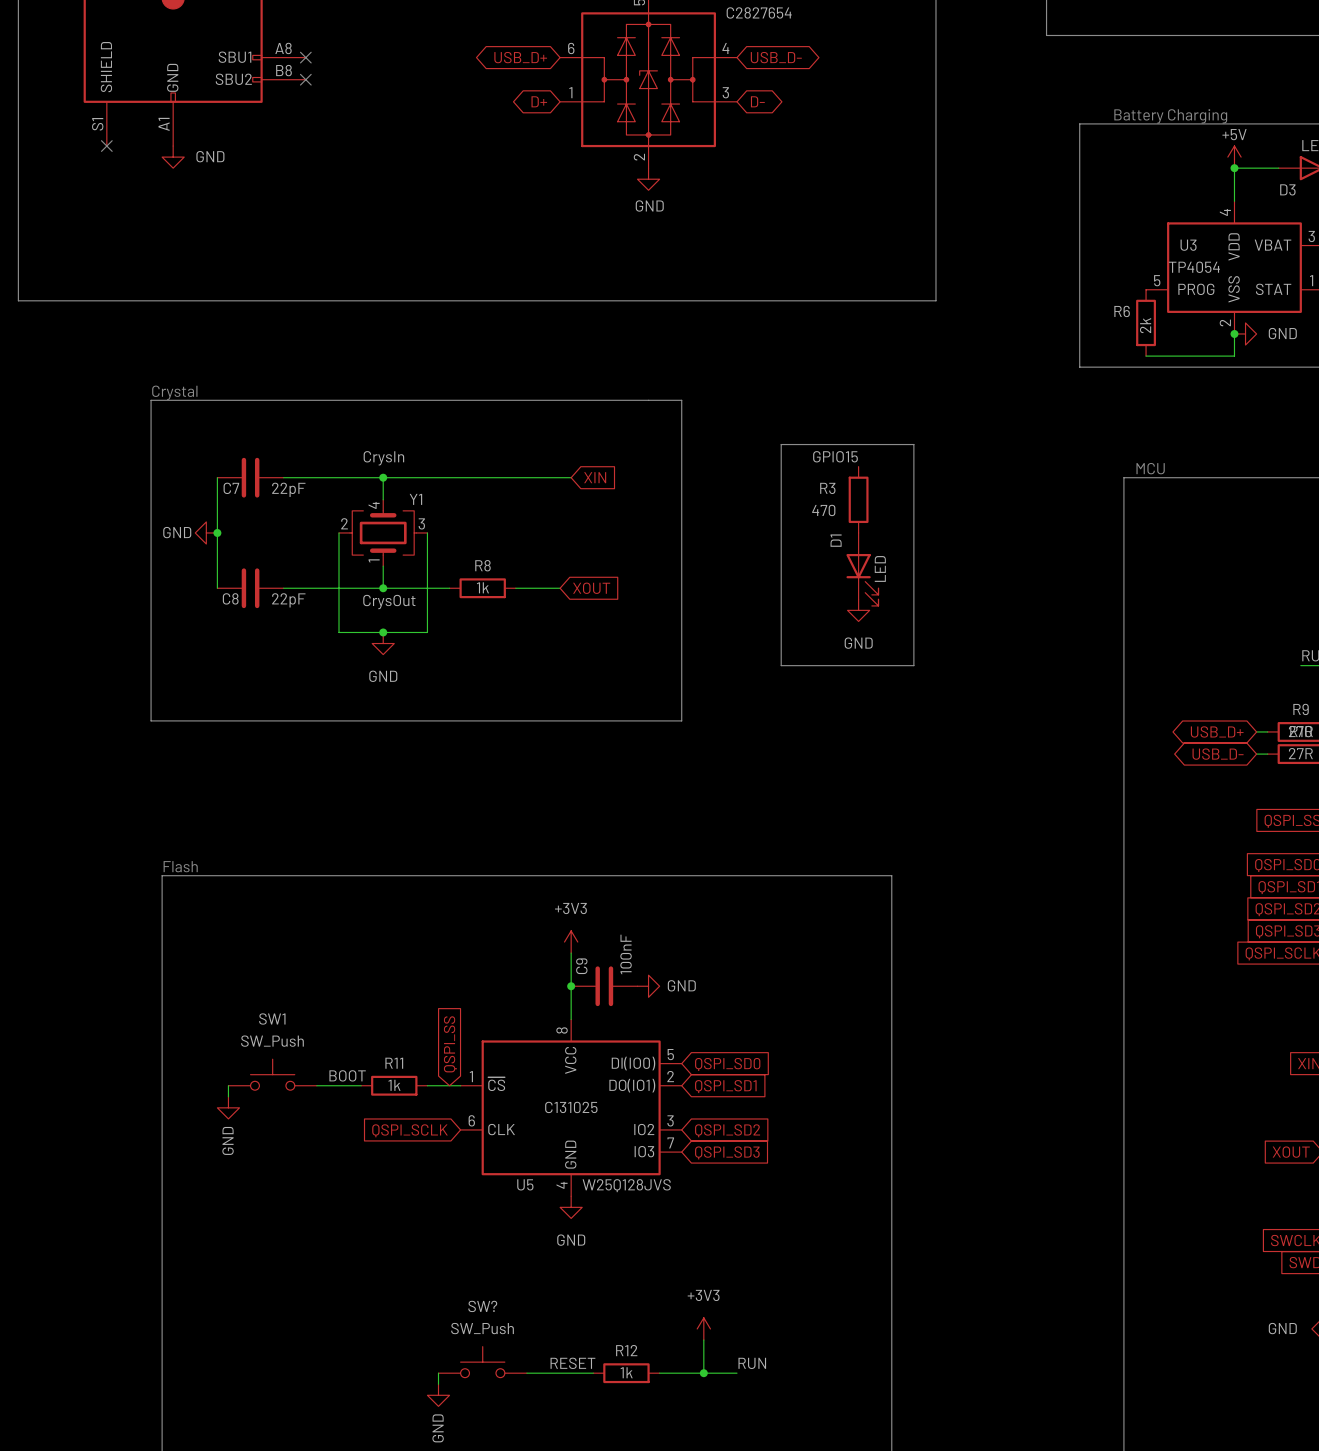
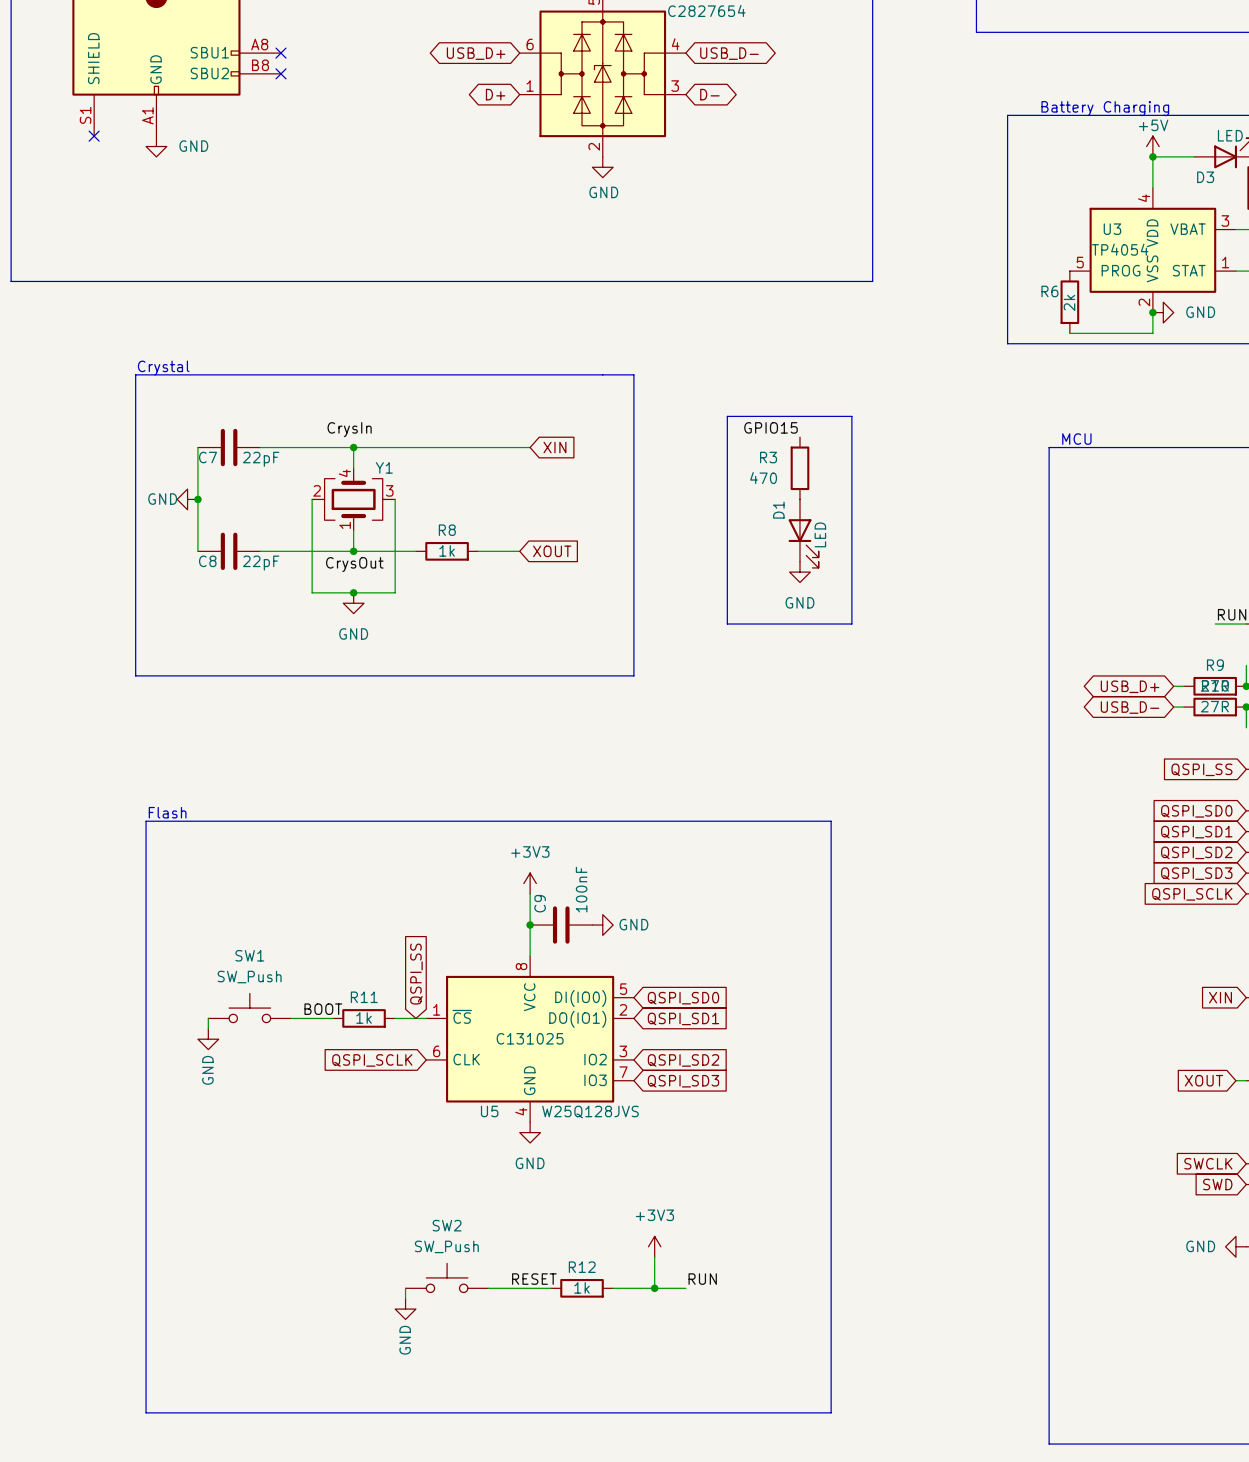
SW? name: SW? (482, 1306) -> SW2 (447, 1225)

